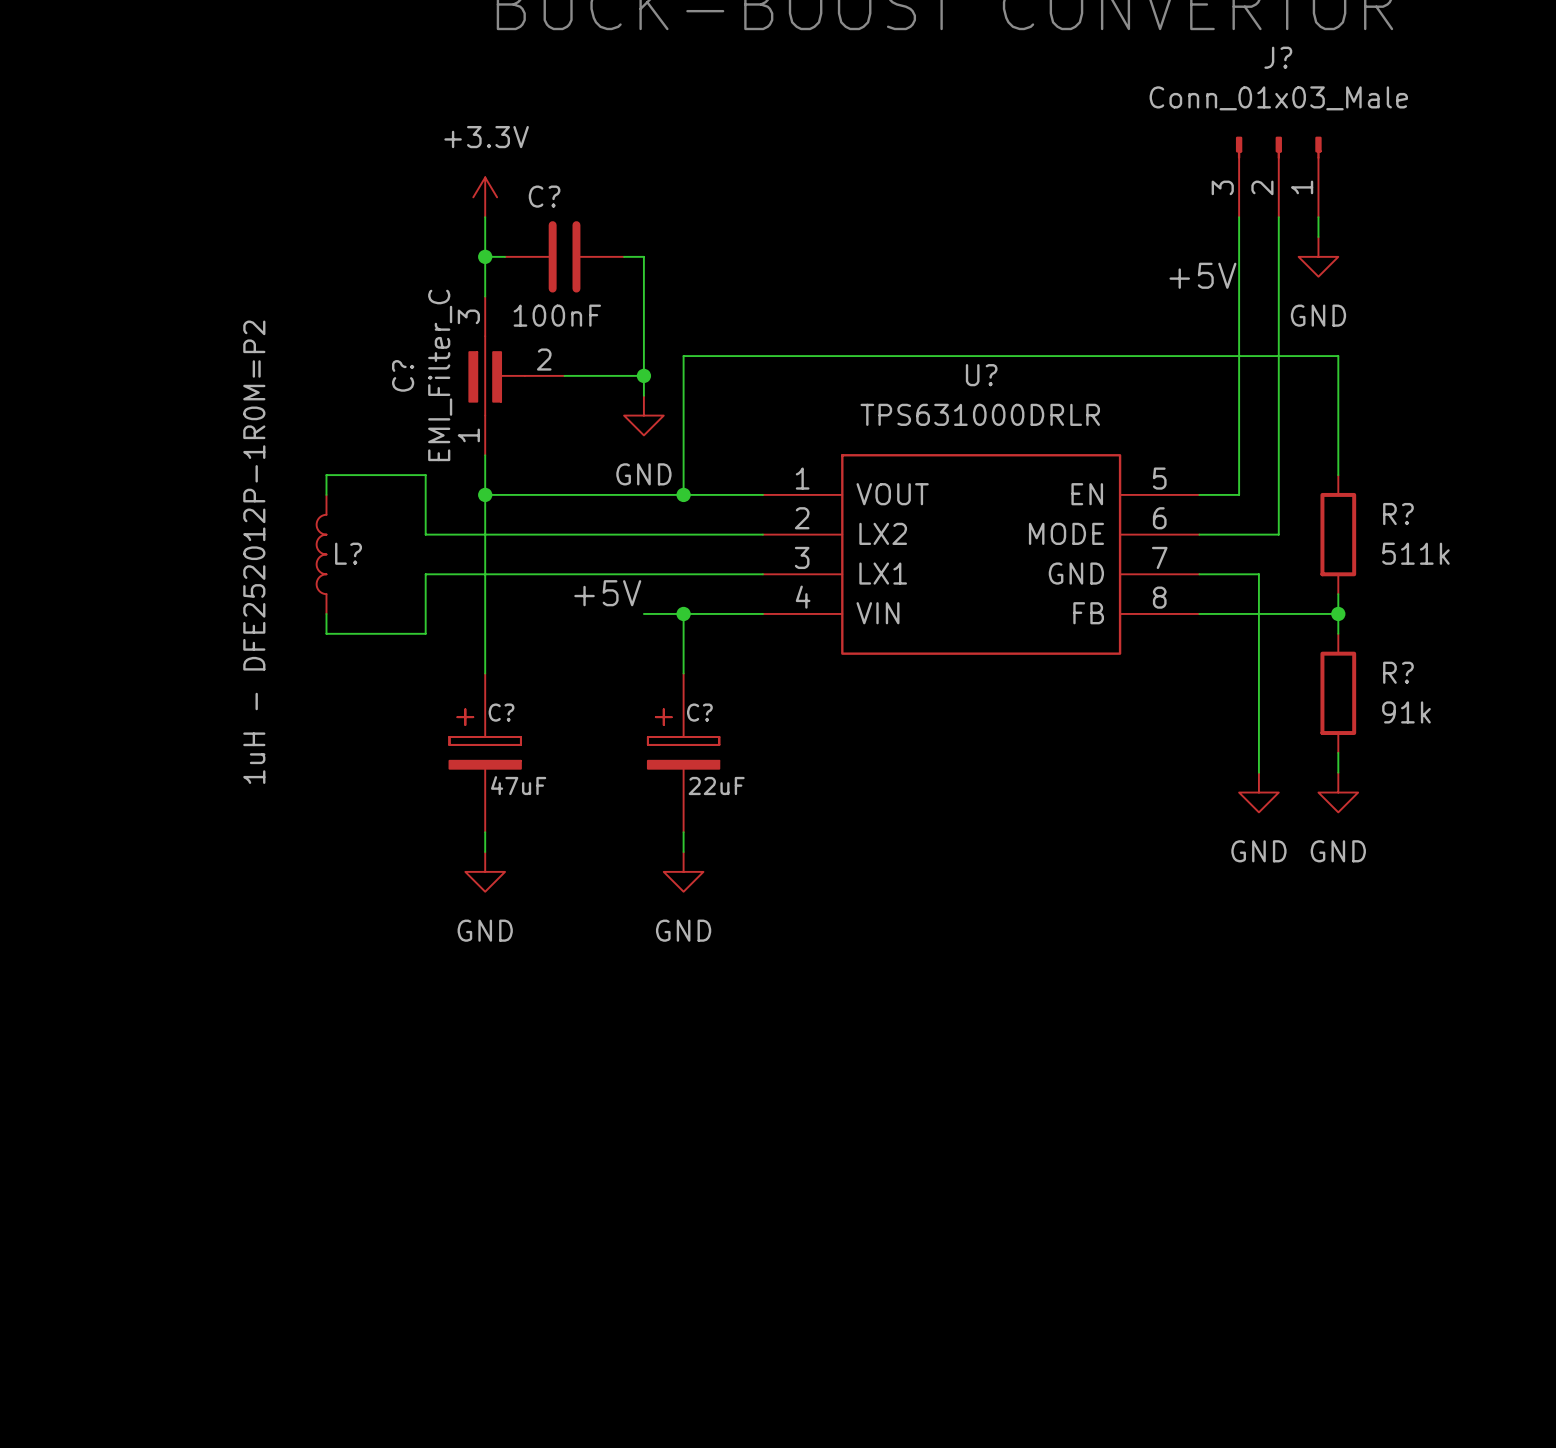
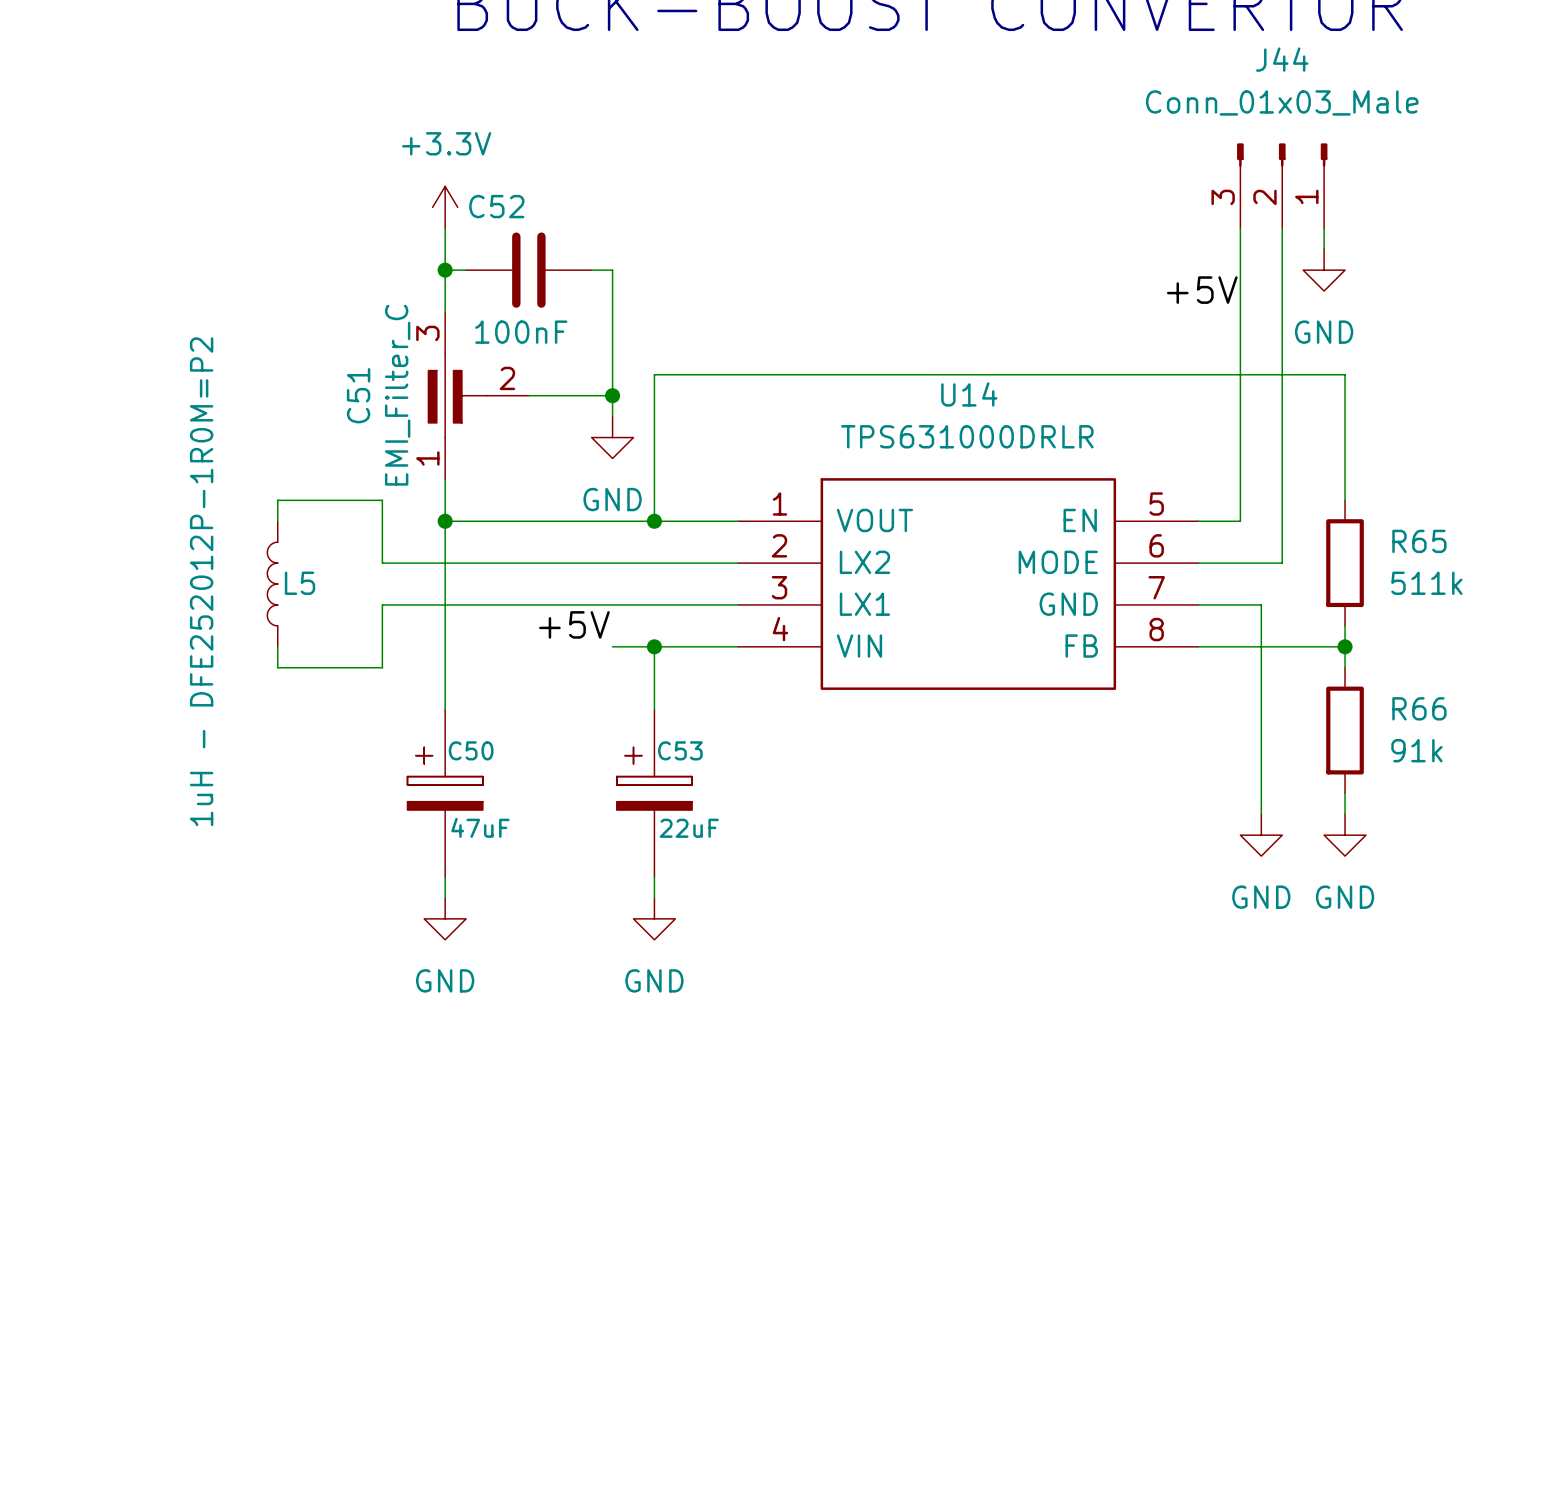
J? name: J? (1278, 57) -> J44 (1282, 59)
C? name: C? (544, 196) -> C52 (496, 206)
C? name: C? (403, 375) -> C51 (358, 395)
U? name: U? (981, 375) -> U14 (969, 394)
R? name: R? (1398, 514) -> R65 (1419, 541)
L? name: L? (348, 553) -> L5 (300, 583)
R? name: R? (1398, 672) -> R66 (1419, 708)
C? name: C? (501, 712) -> C50 (471, 750)
C? name: C? (699, 712) -> C53 (680, 750)

